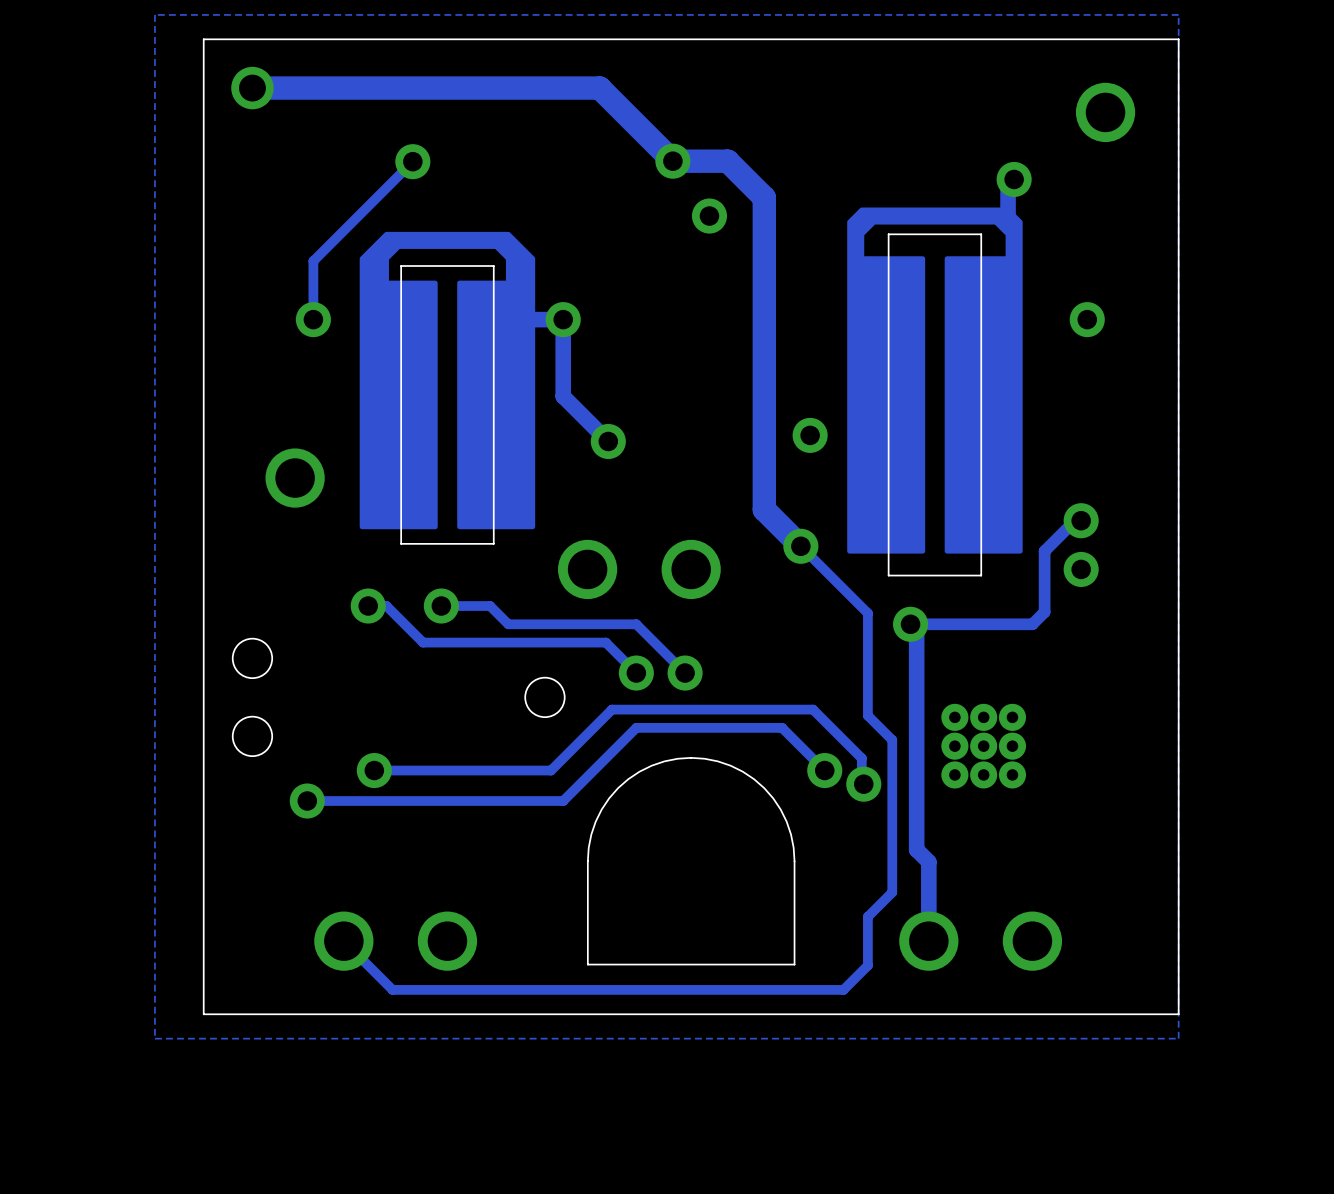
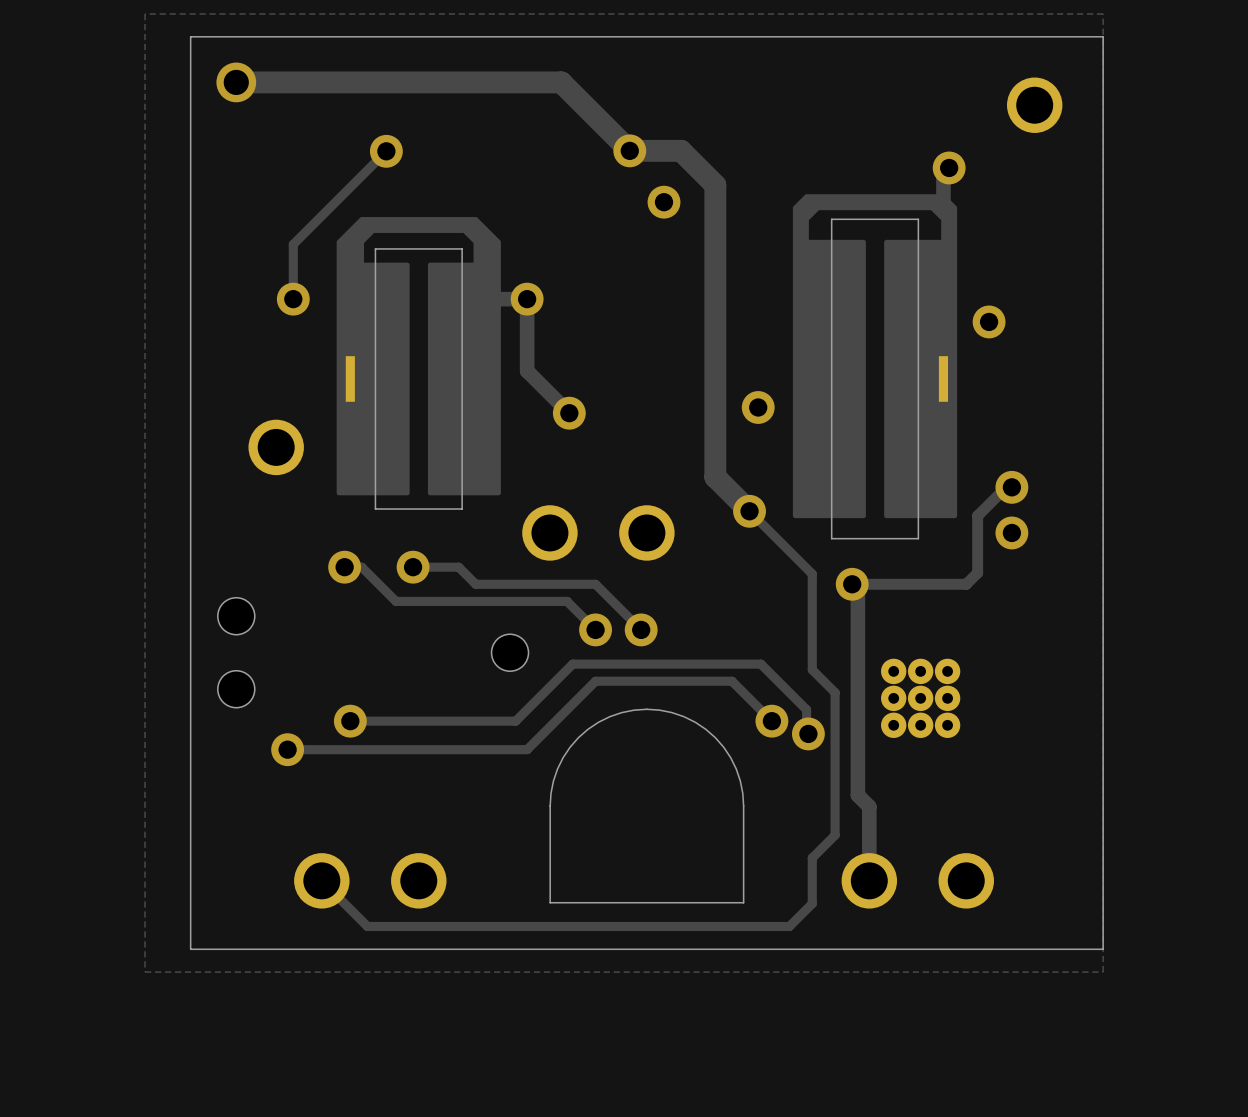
via position: (1087, 319) -> (989, 321)

